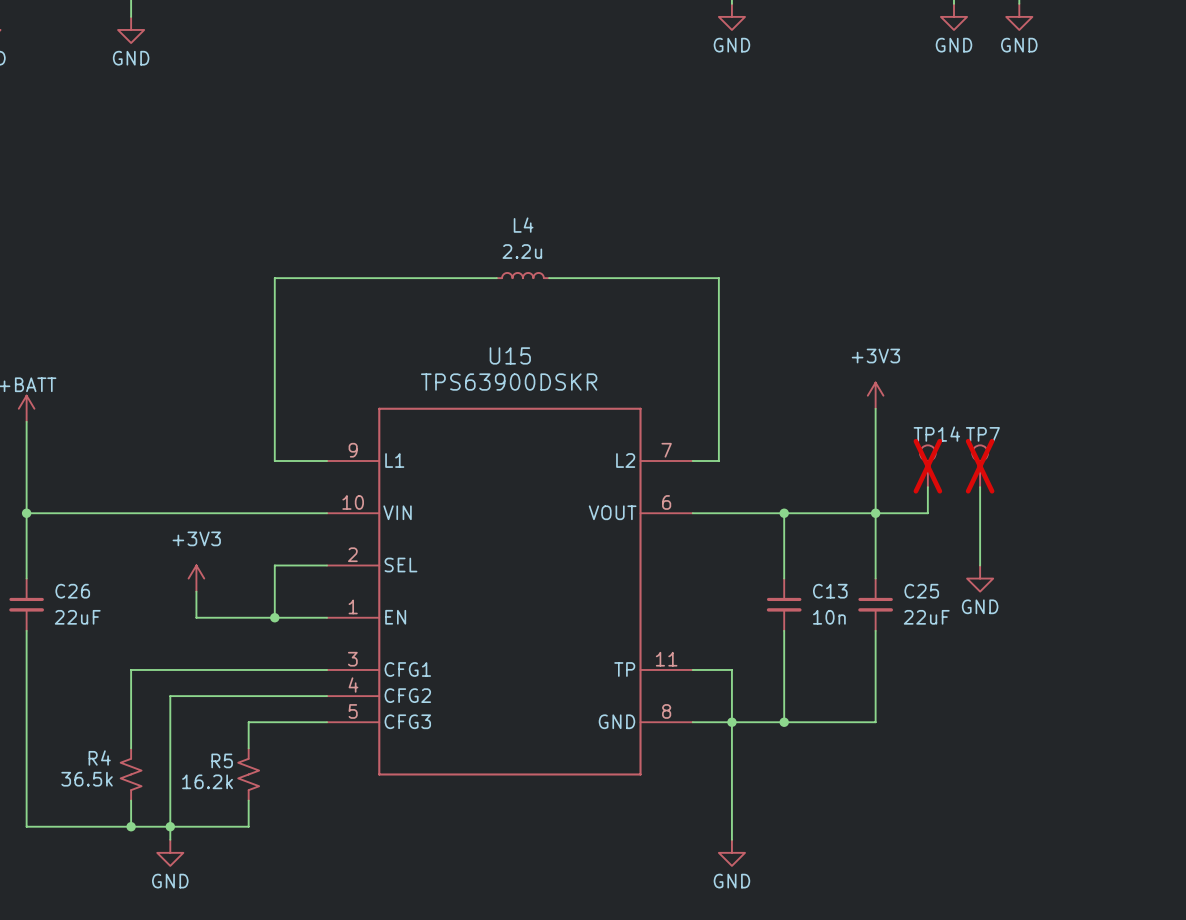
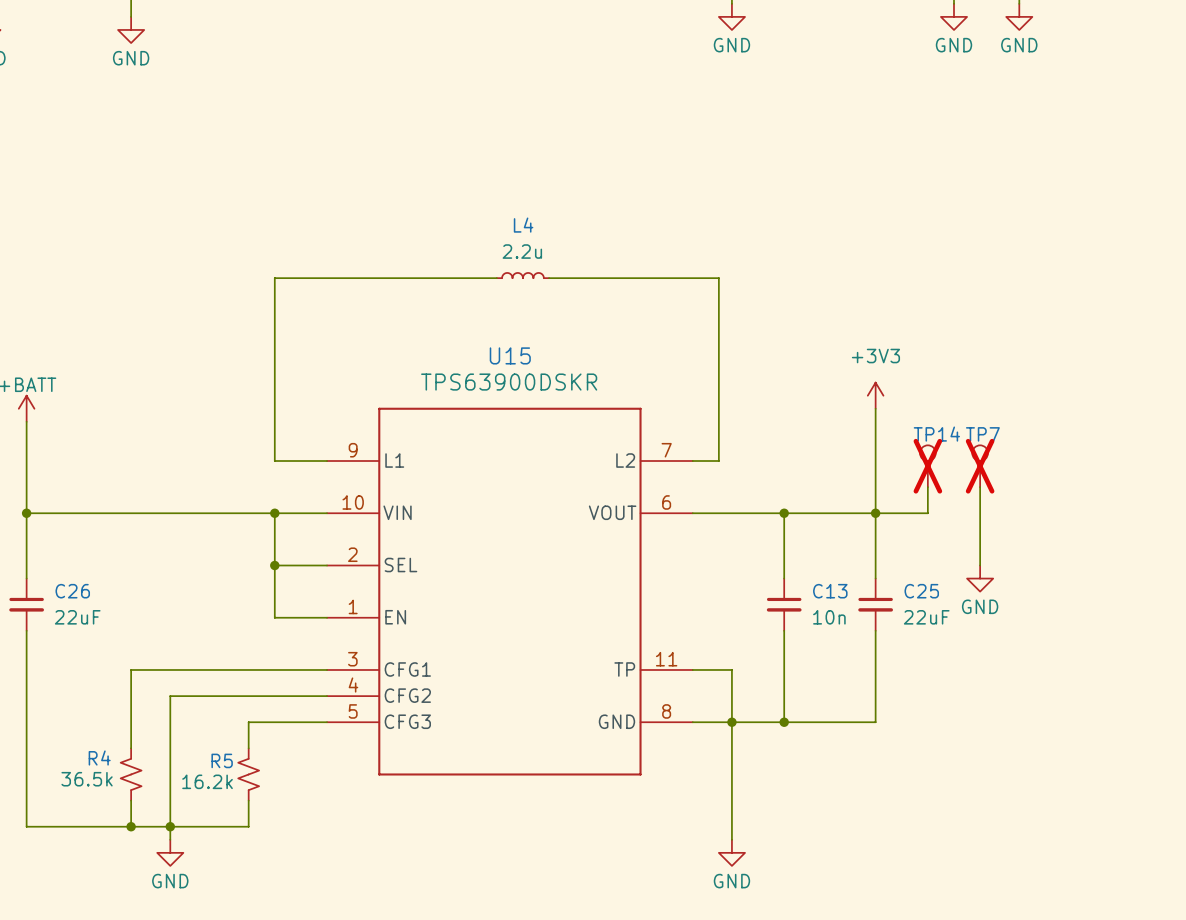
wire: none -> (274, 513) (274, 565)
junction: none -> (274, 513)
junction: none -> (274, 565)
power symbol: +3V3 (196, 578) -> none
wire: (196, 591) (196, 617) (274, 617) -> none
junction: (274, 617) -> none

